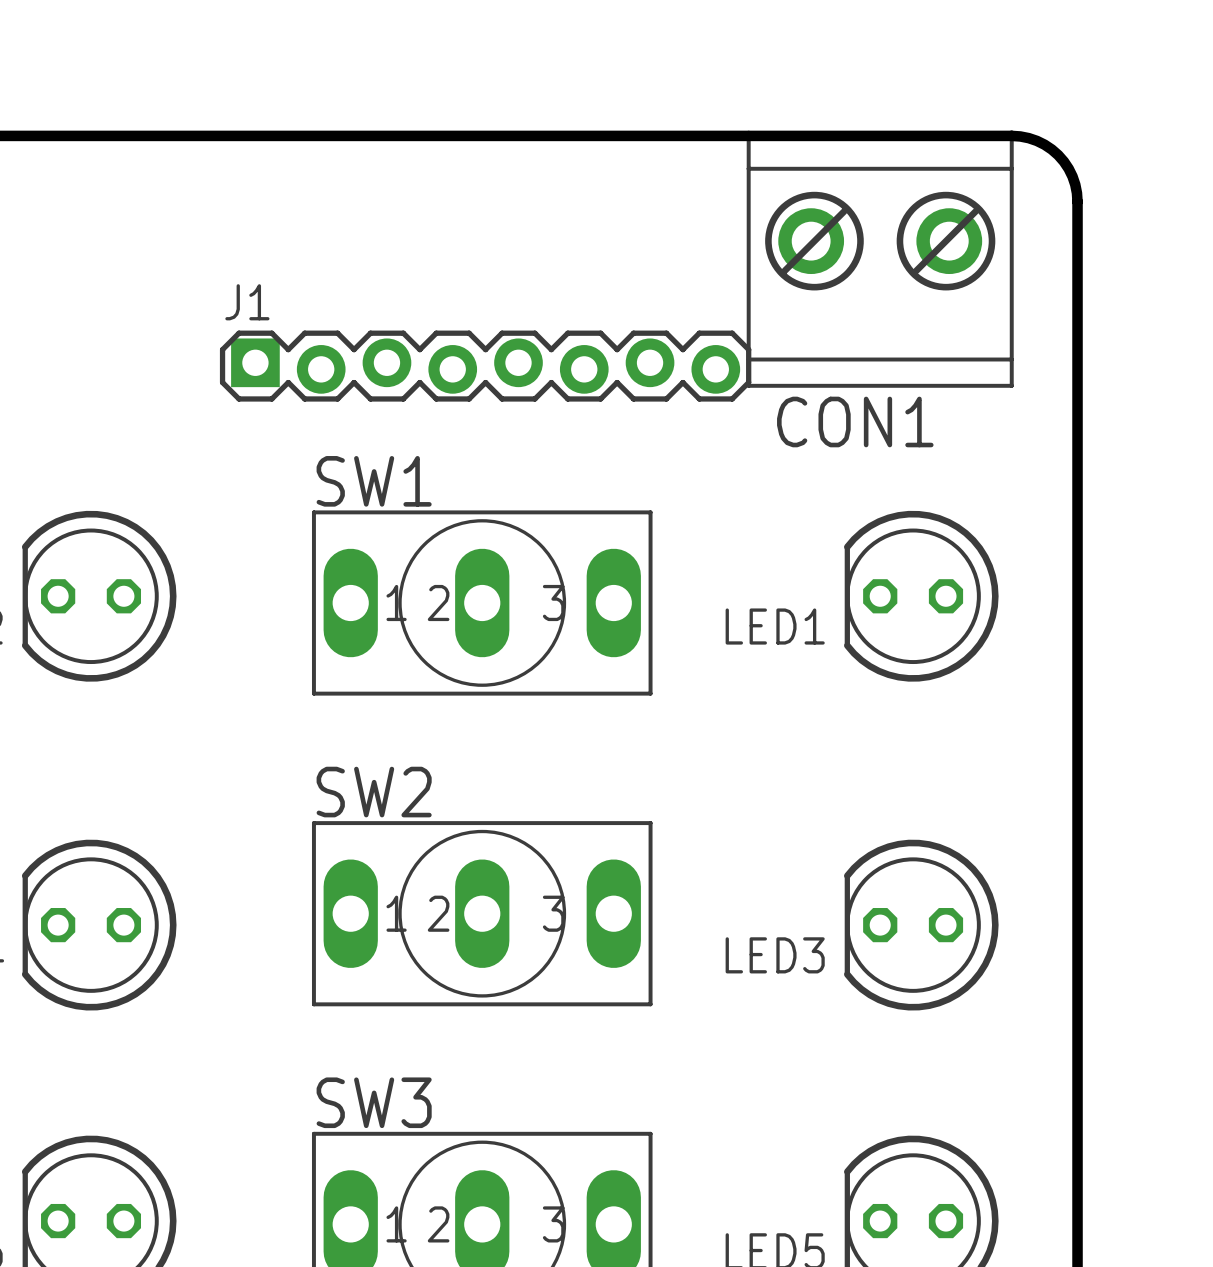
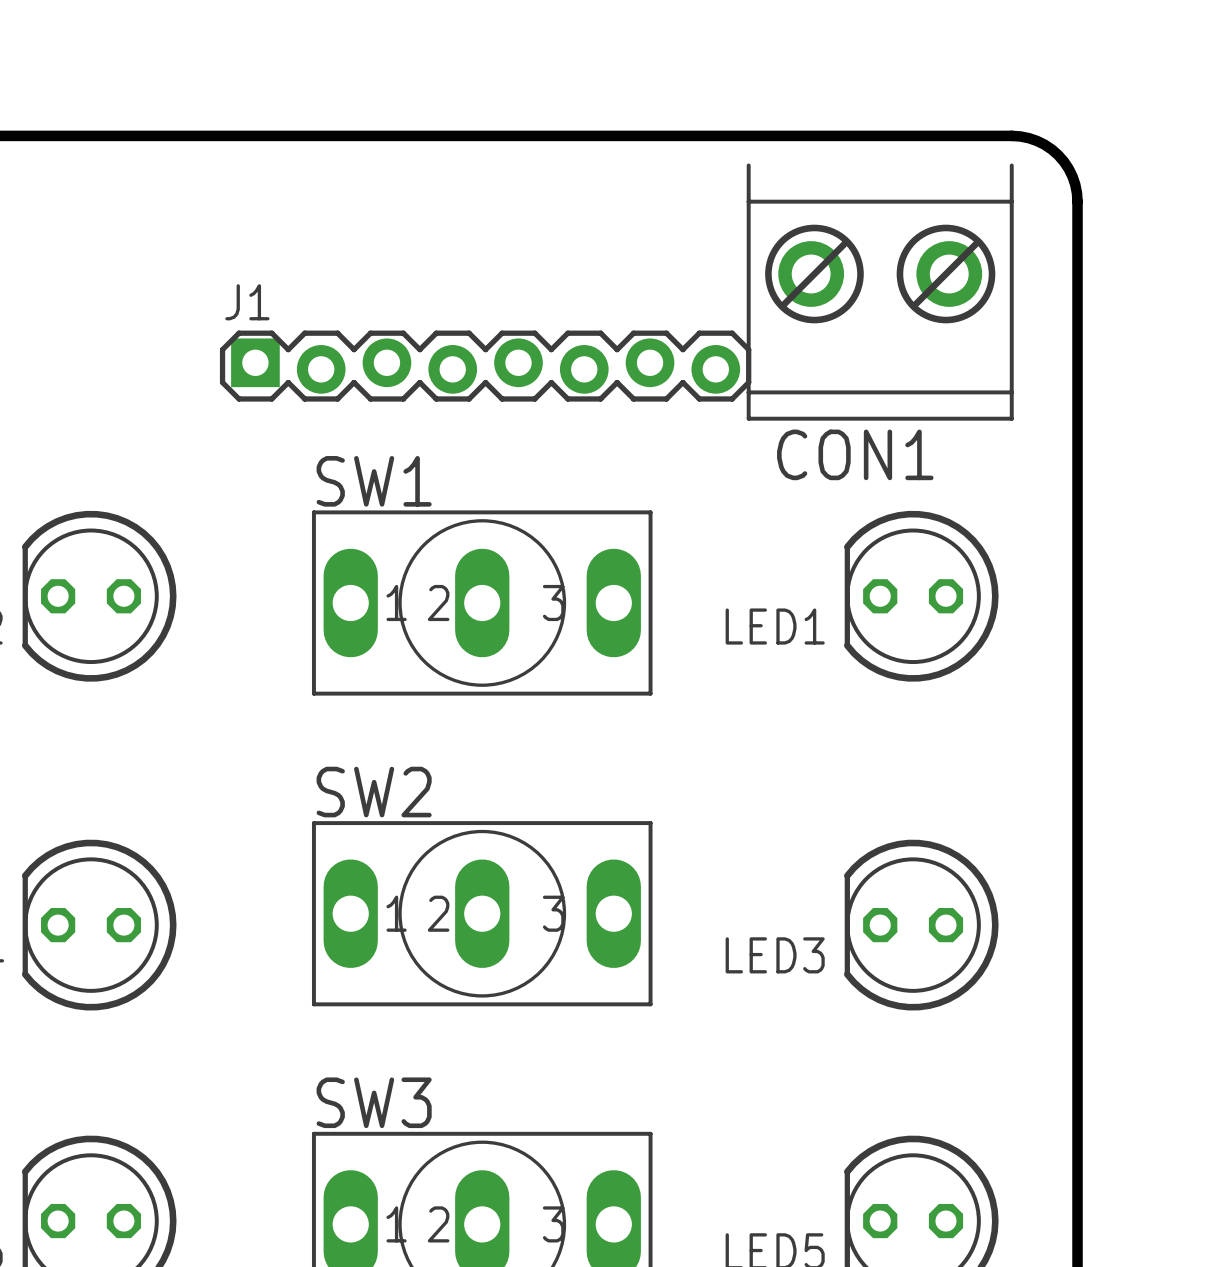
CON1 position: (880, 259) -> (880, 292)

